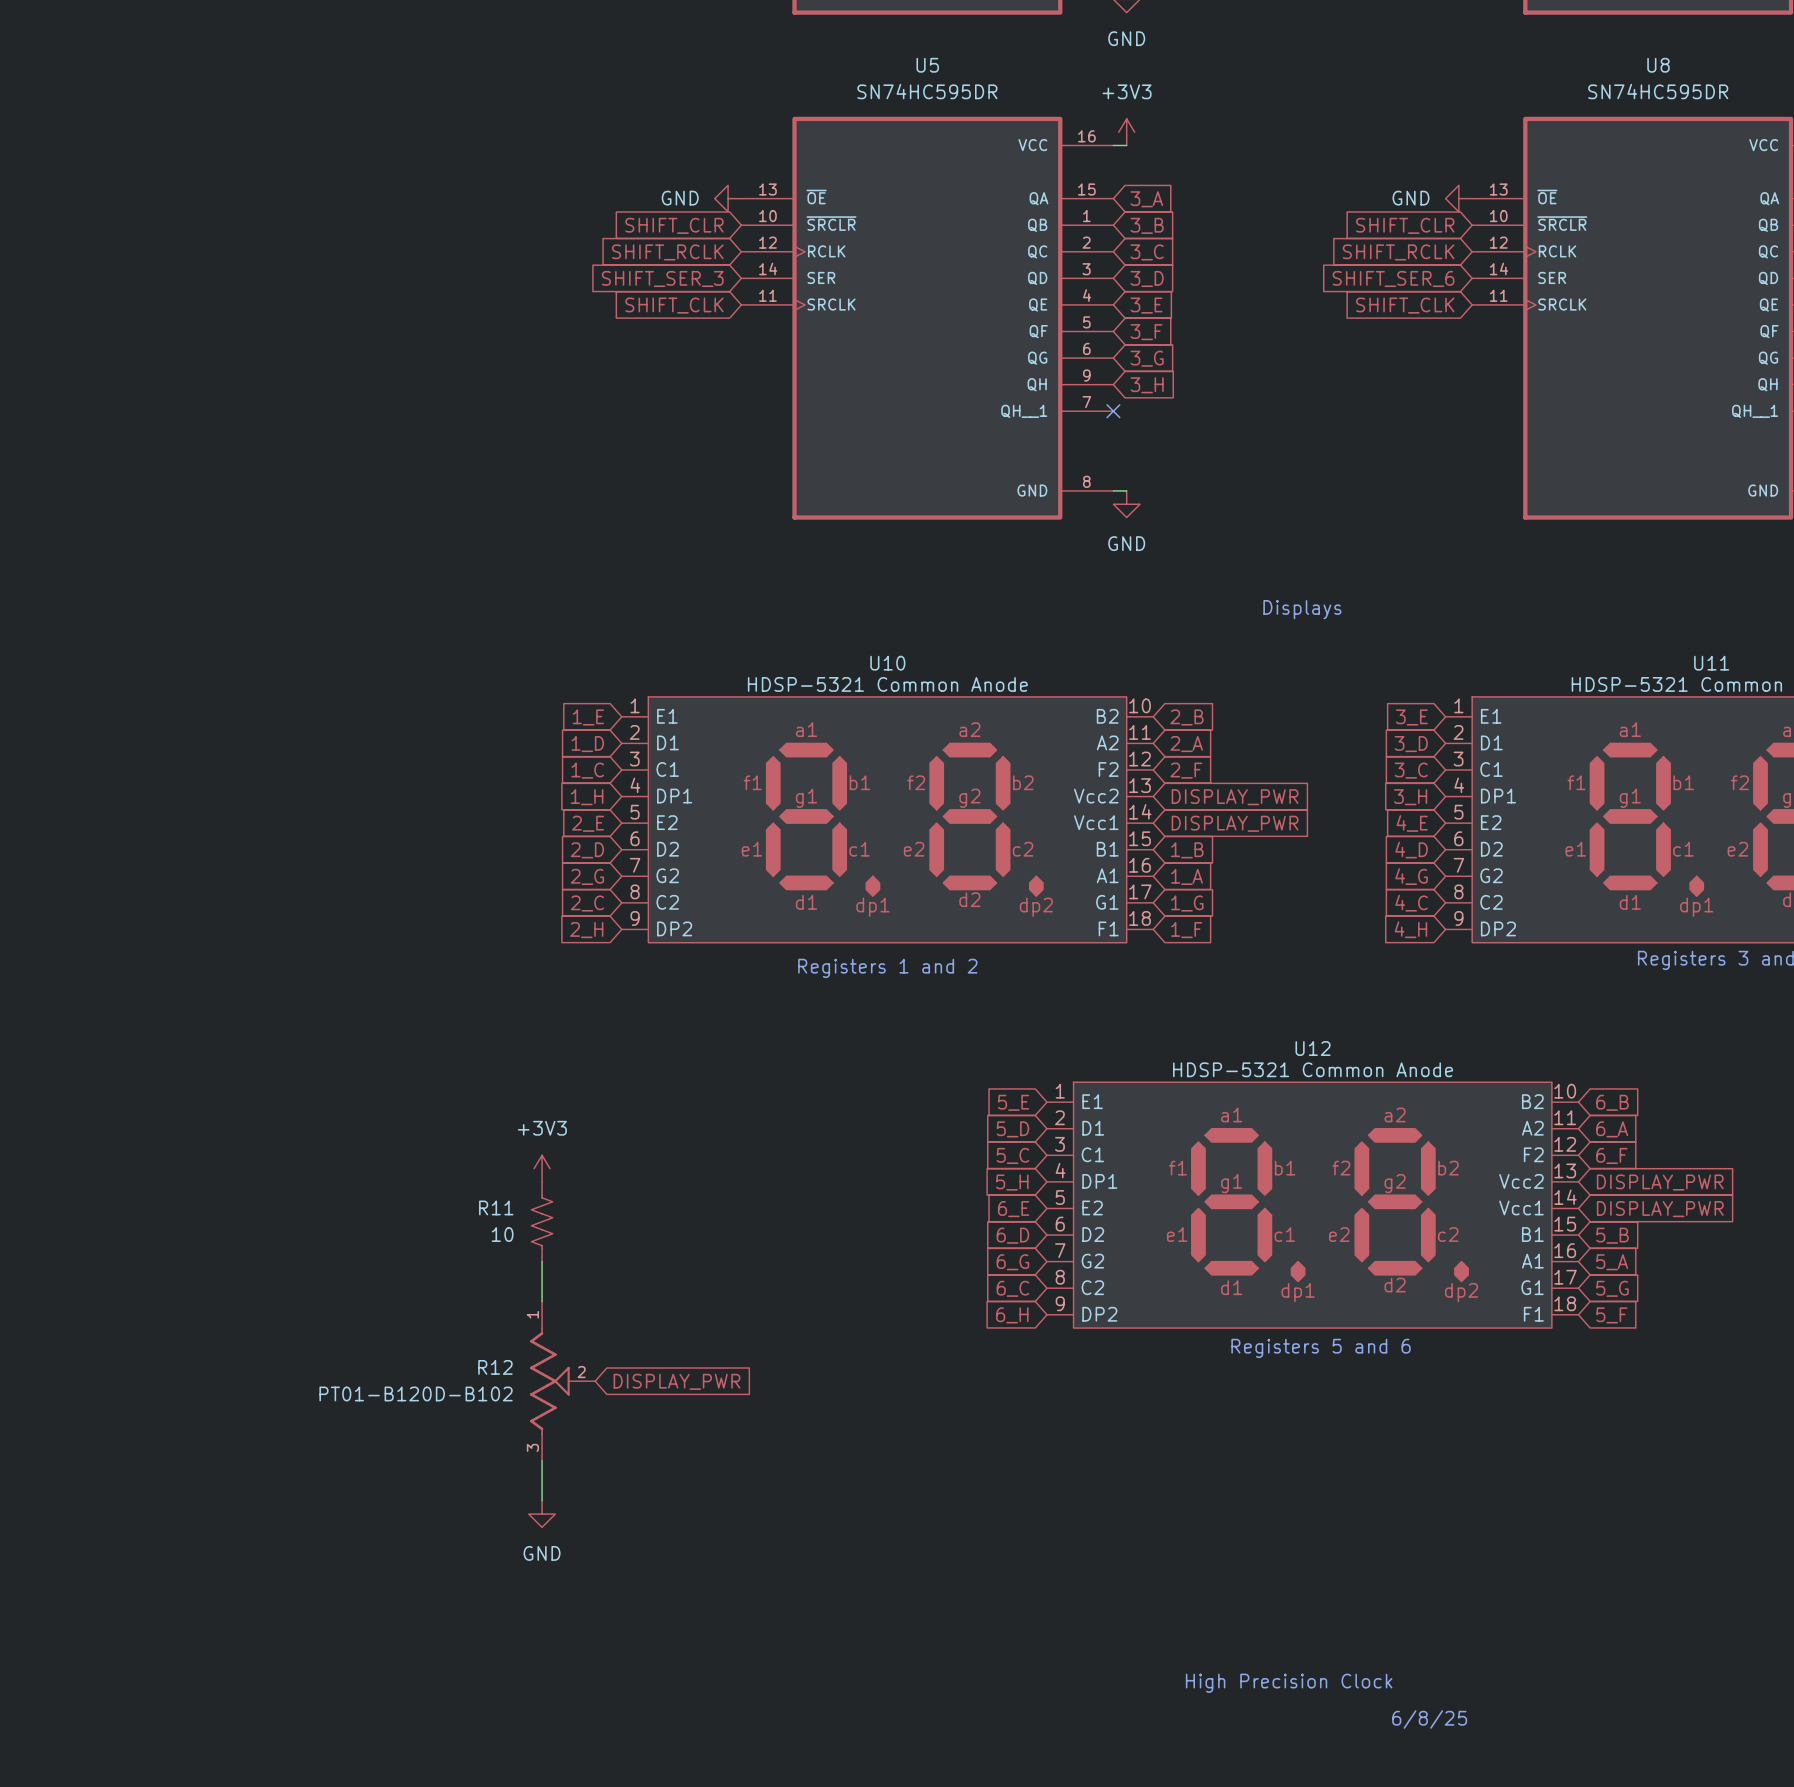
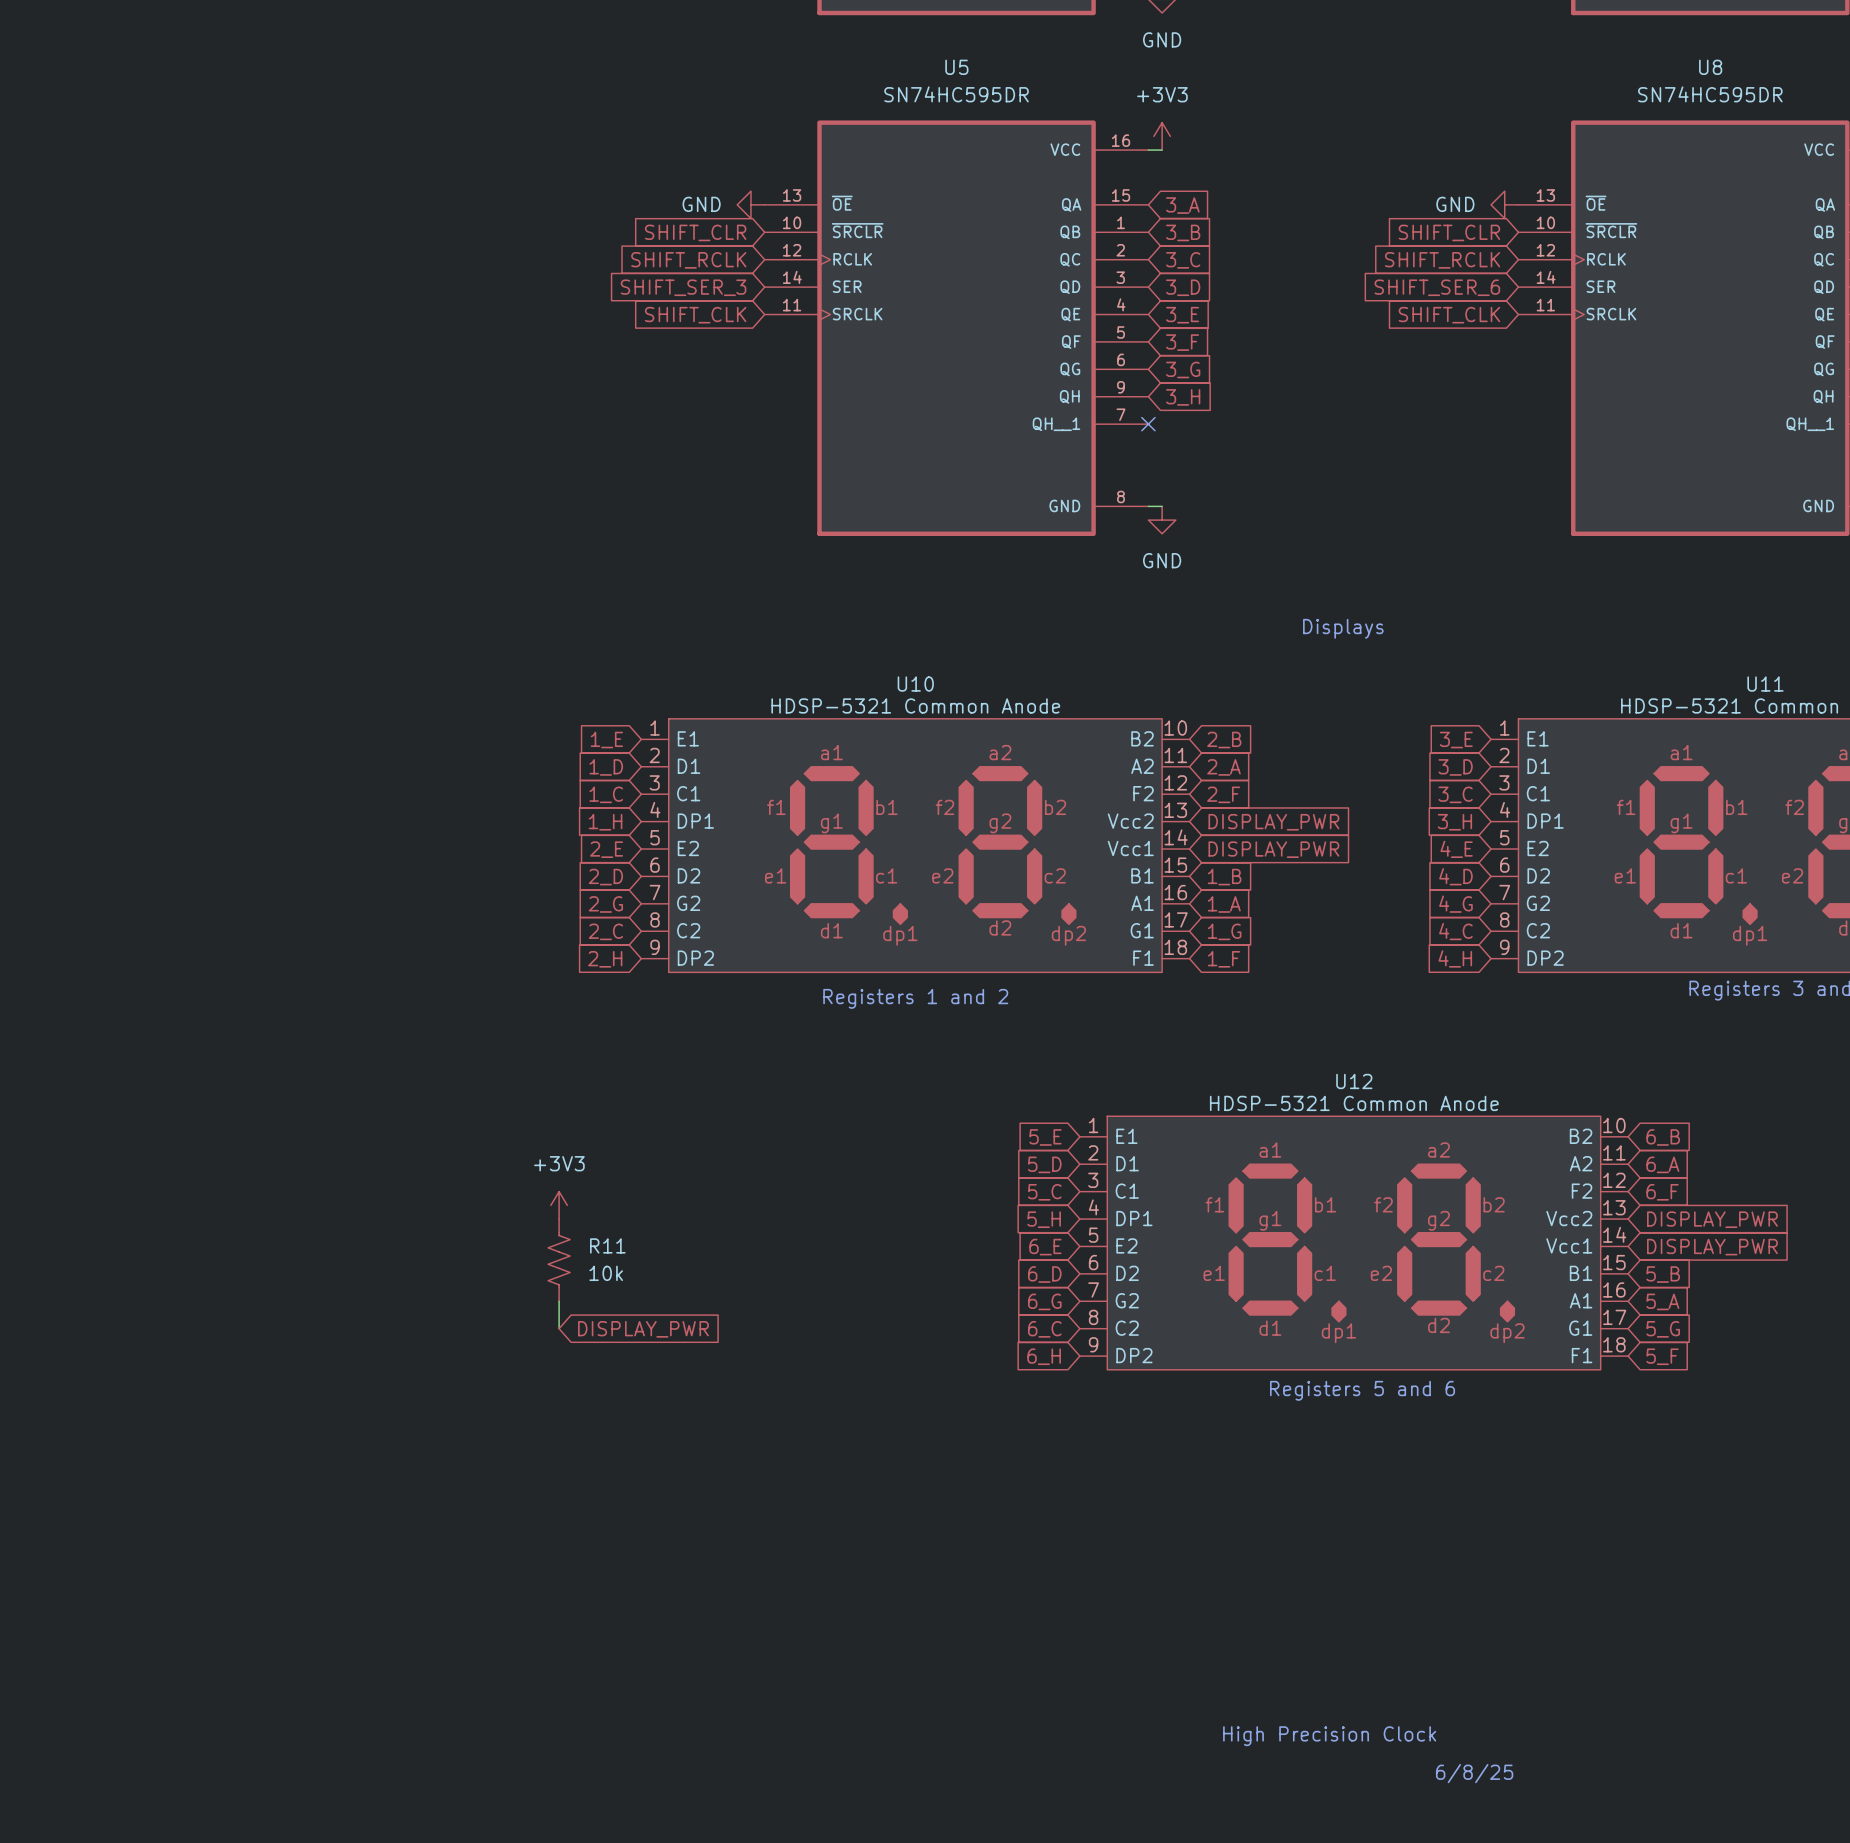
R11 name position: R11 (496, 1207) -> R11 (607, 1245)
R11 value: 10 (502, 1234) -> 10k (606, 1273)
wire: (542, 1288) (542, 1301) -> none
R12: PT01-B120D-B102 (562, 1381) -> none
global label position: DISPLAY_PWR (677, 1381) -> DISPLAY_PWR (643, 1329)
wire: (542, 1460) (542, 1500) -> none
power symbol: GND (542, 1514) -> none

